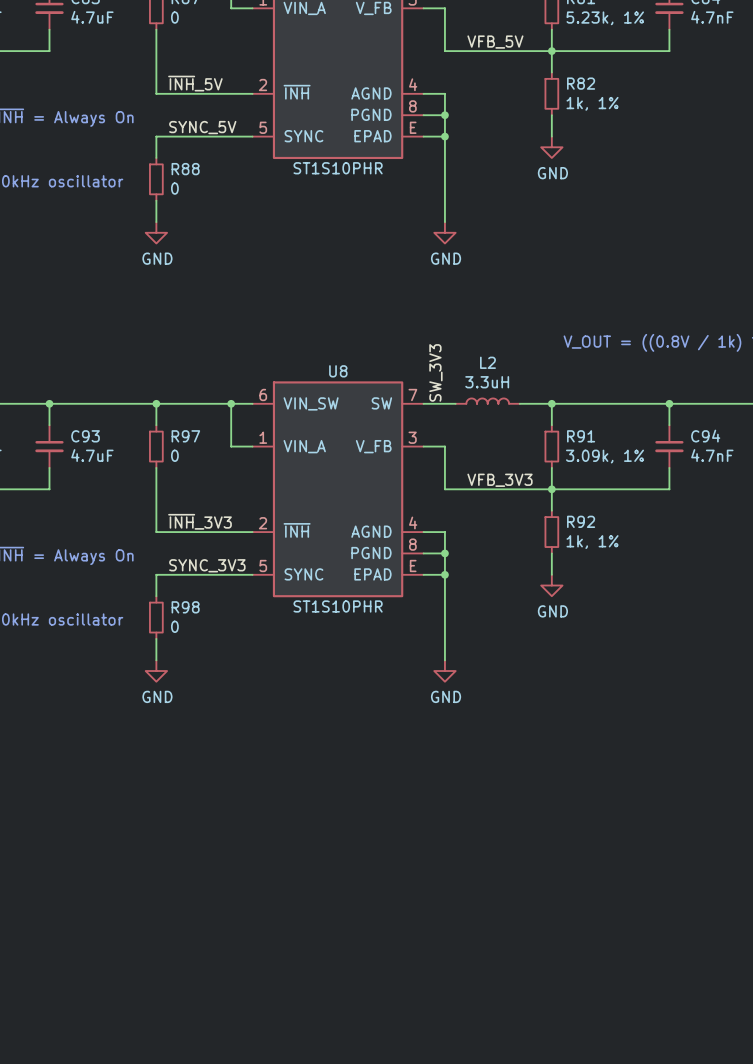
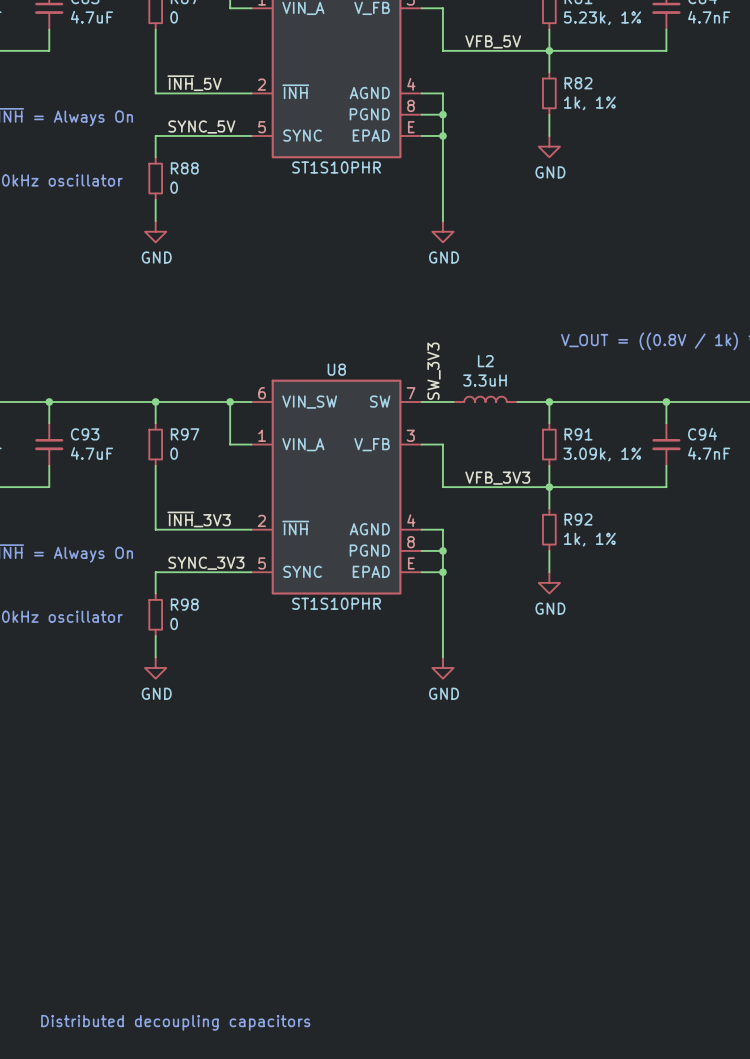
text: none -> Distributed decoupling capacitors (175, 1022)

